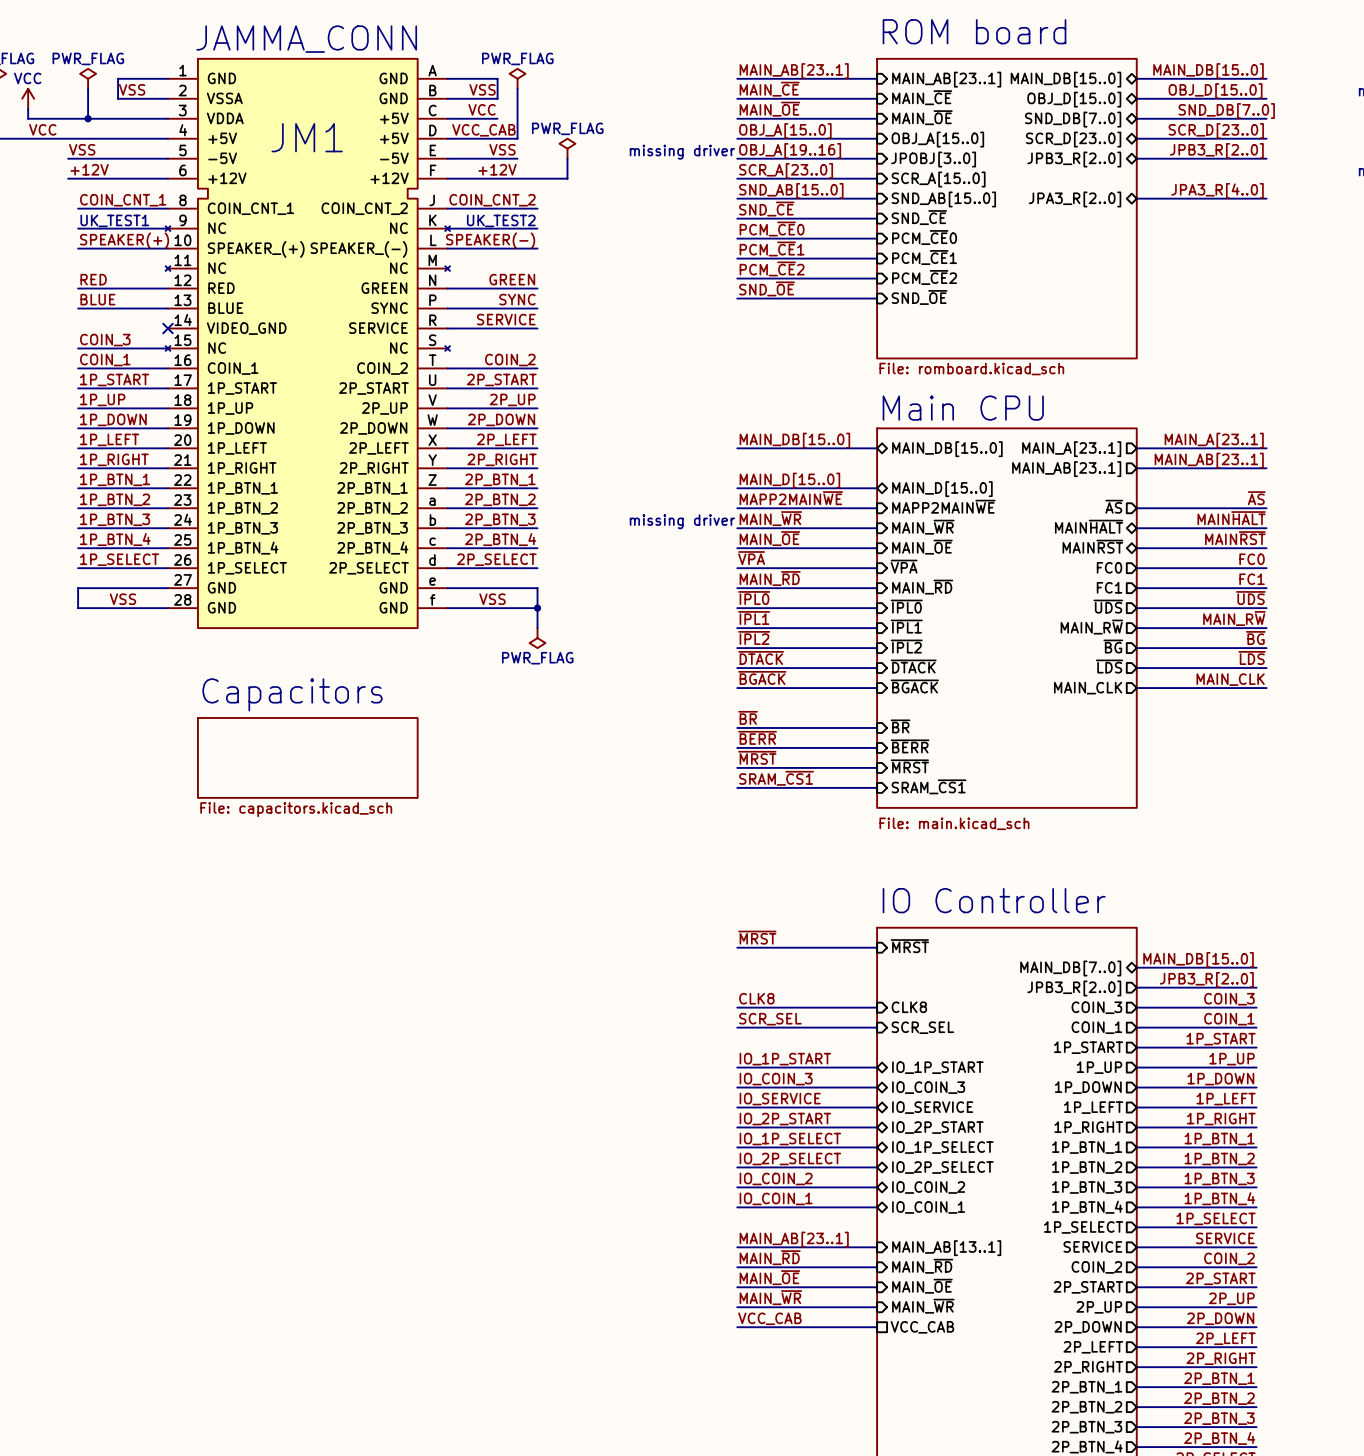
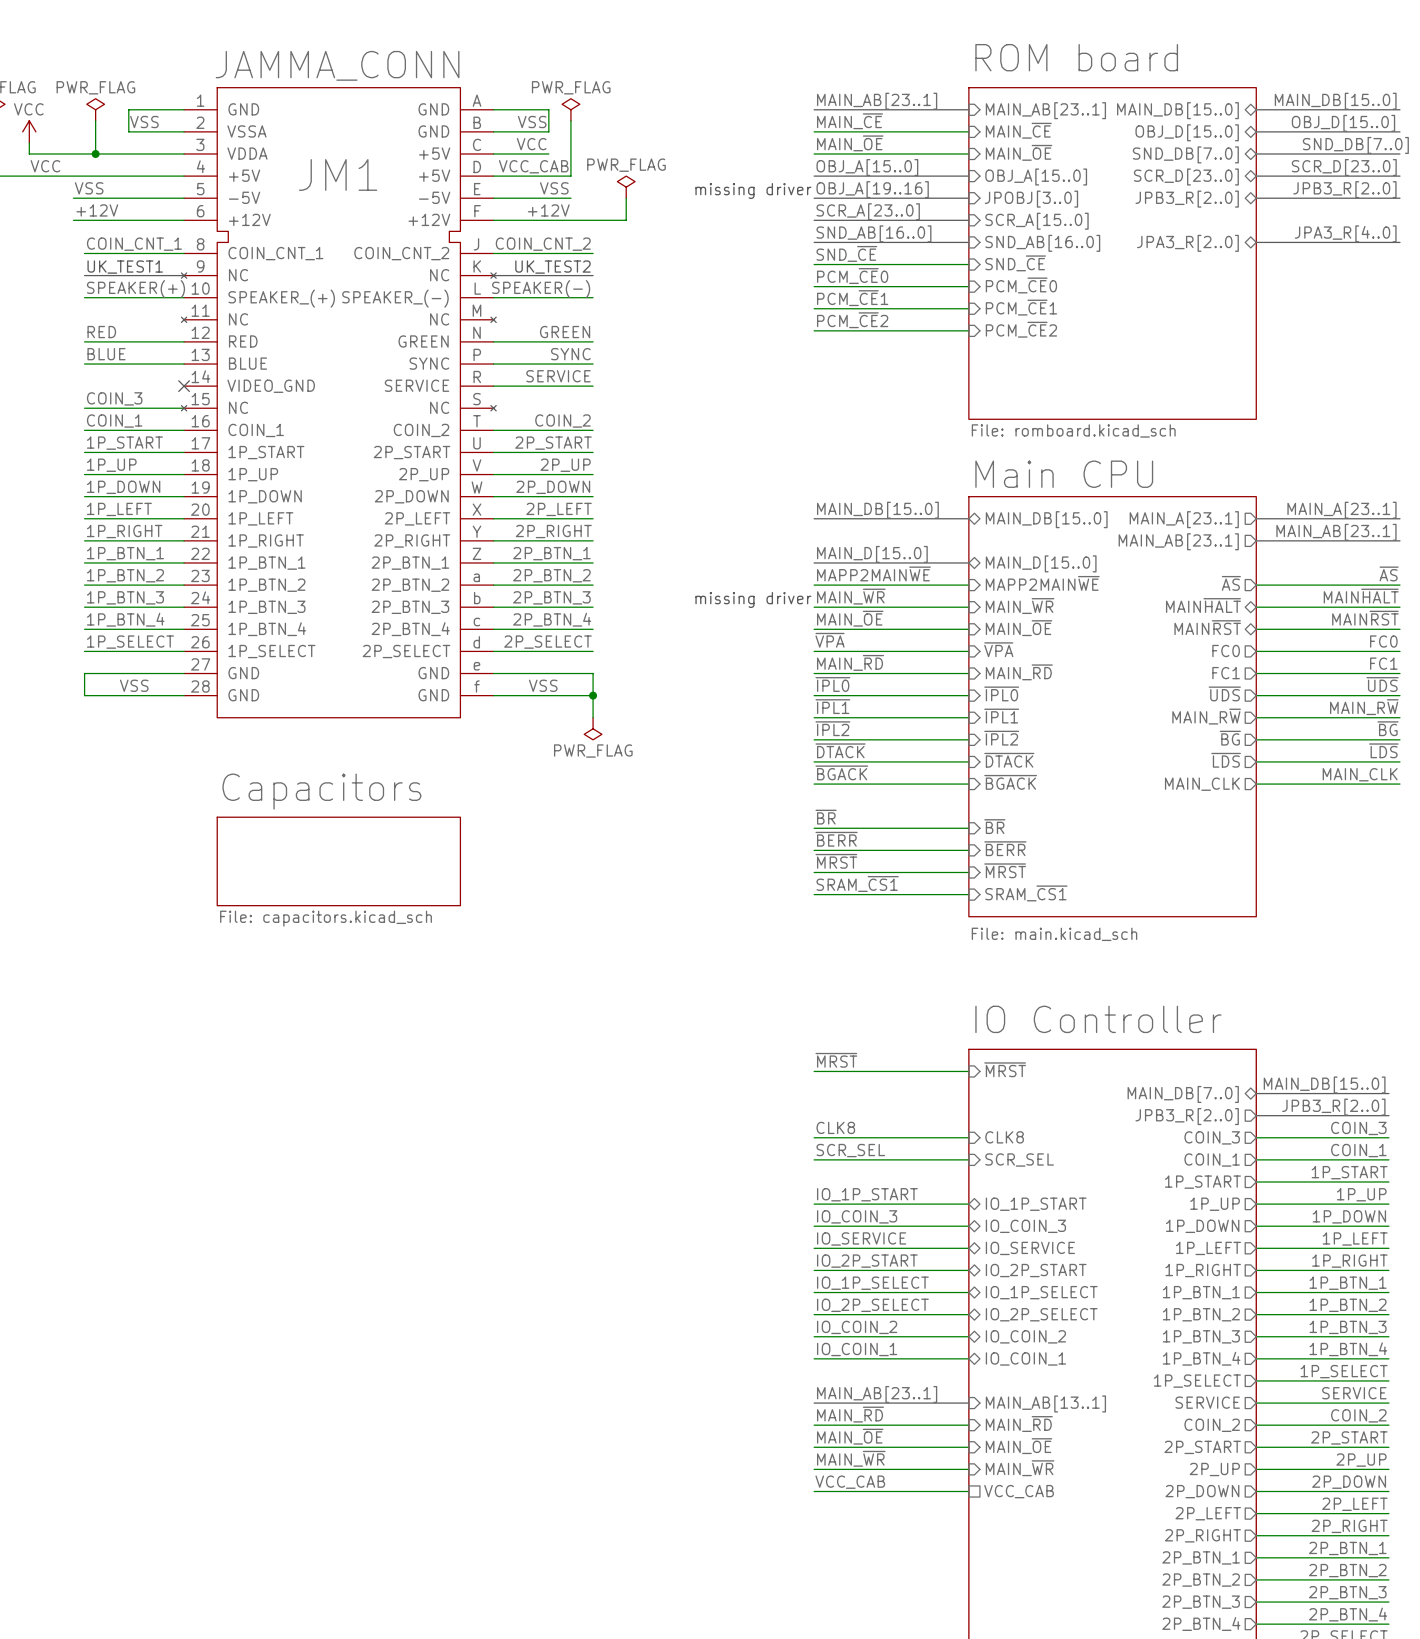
label: SND_AB[15..0] (791, 190) -> SND_AB[16..0] (873, 233)
sheet pin: SND_AB[15..0] (943, 199) -> SND_AB[16..0] (1042, 243)
label: SND_~{OE} (767, 288) -> none
sheet pin: SND_~{OE} (919, 297) -> none
wire: (737, 298) (877, 298) -> none

